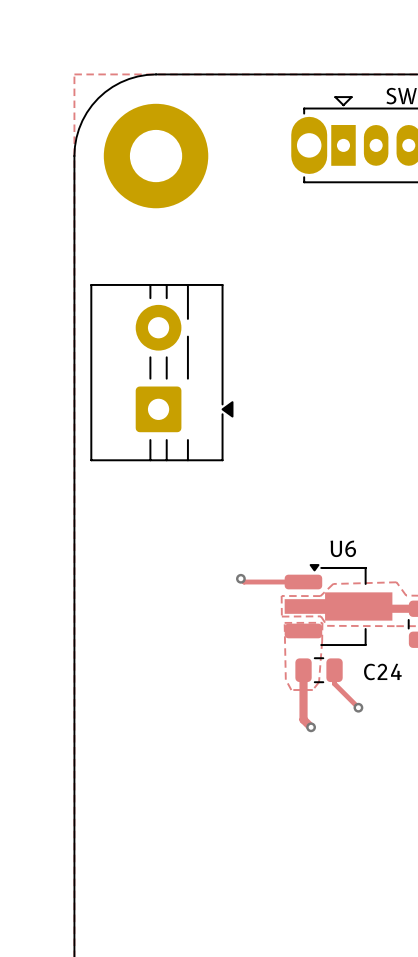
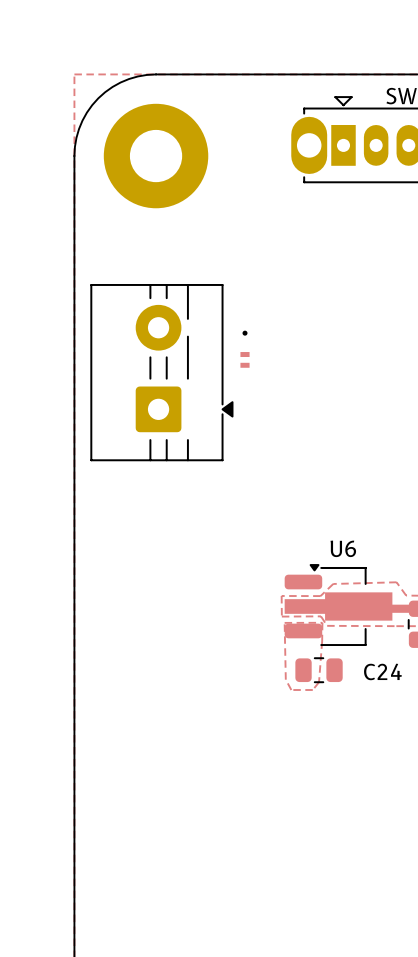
part: none -> (245, 349)
track: (240, 578) (244, 582) (303, 582) -> none
via: (240, 578) -> none
track: (303, 670) (303, 719) (311, 727) -> none
track: (334, 670) (334, 683) (358, 707) -> none
via: (358, 707) -> none
via: (311, 727) -> none

